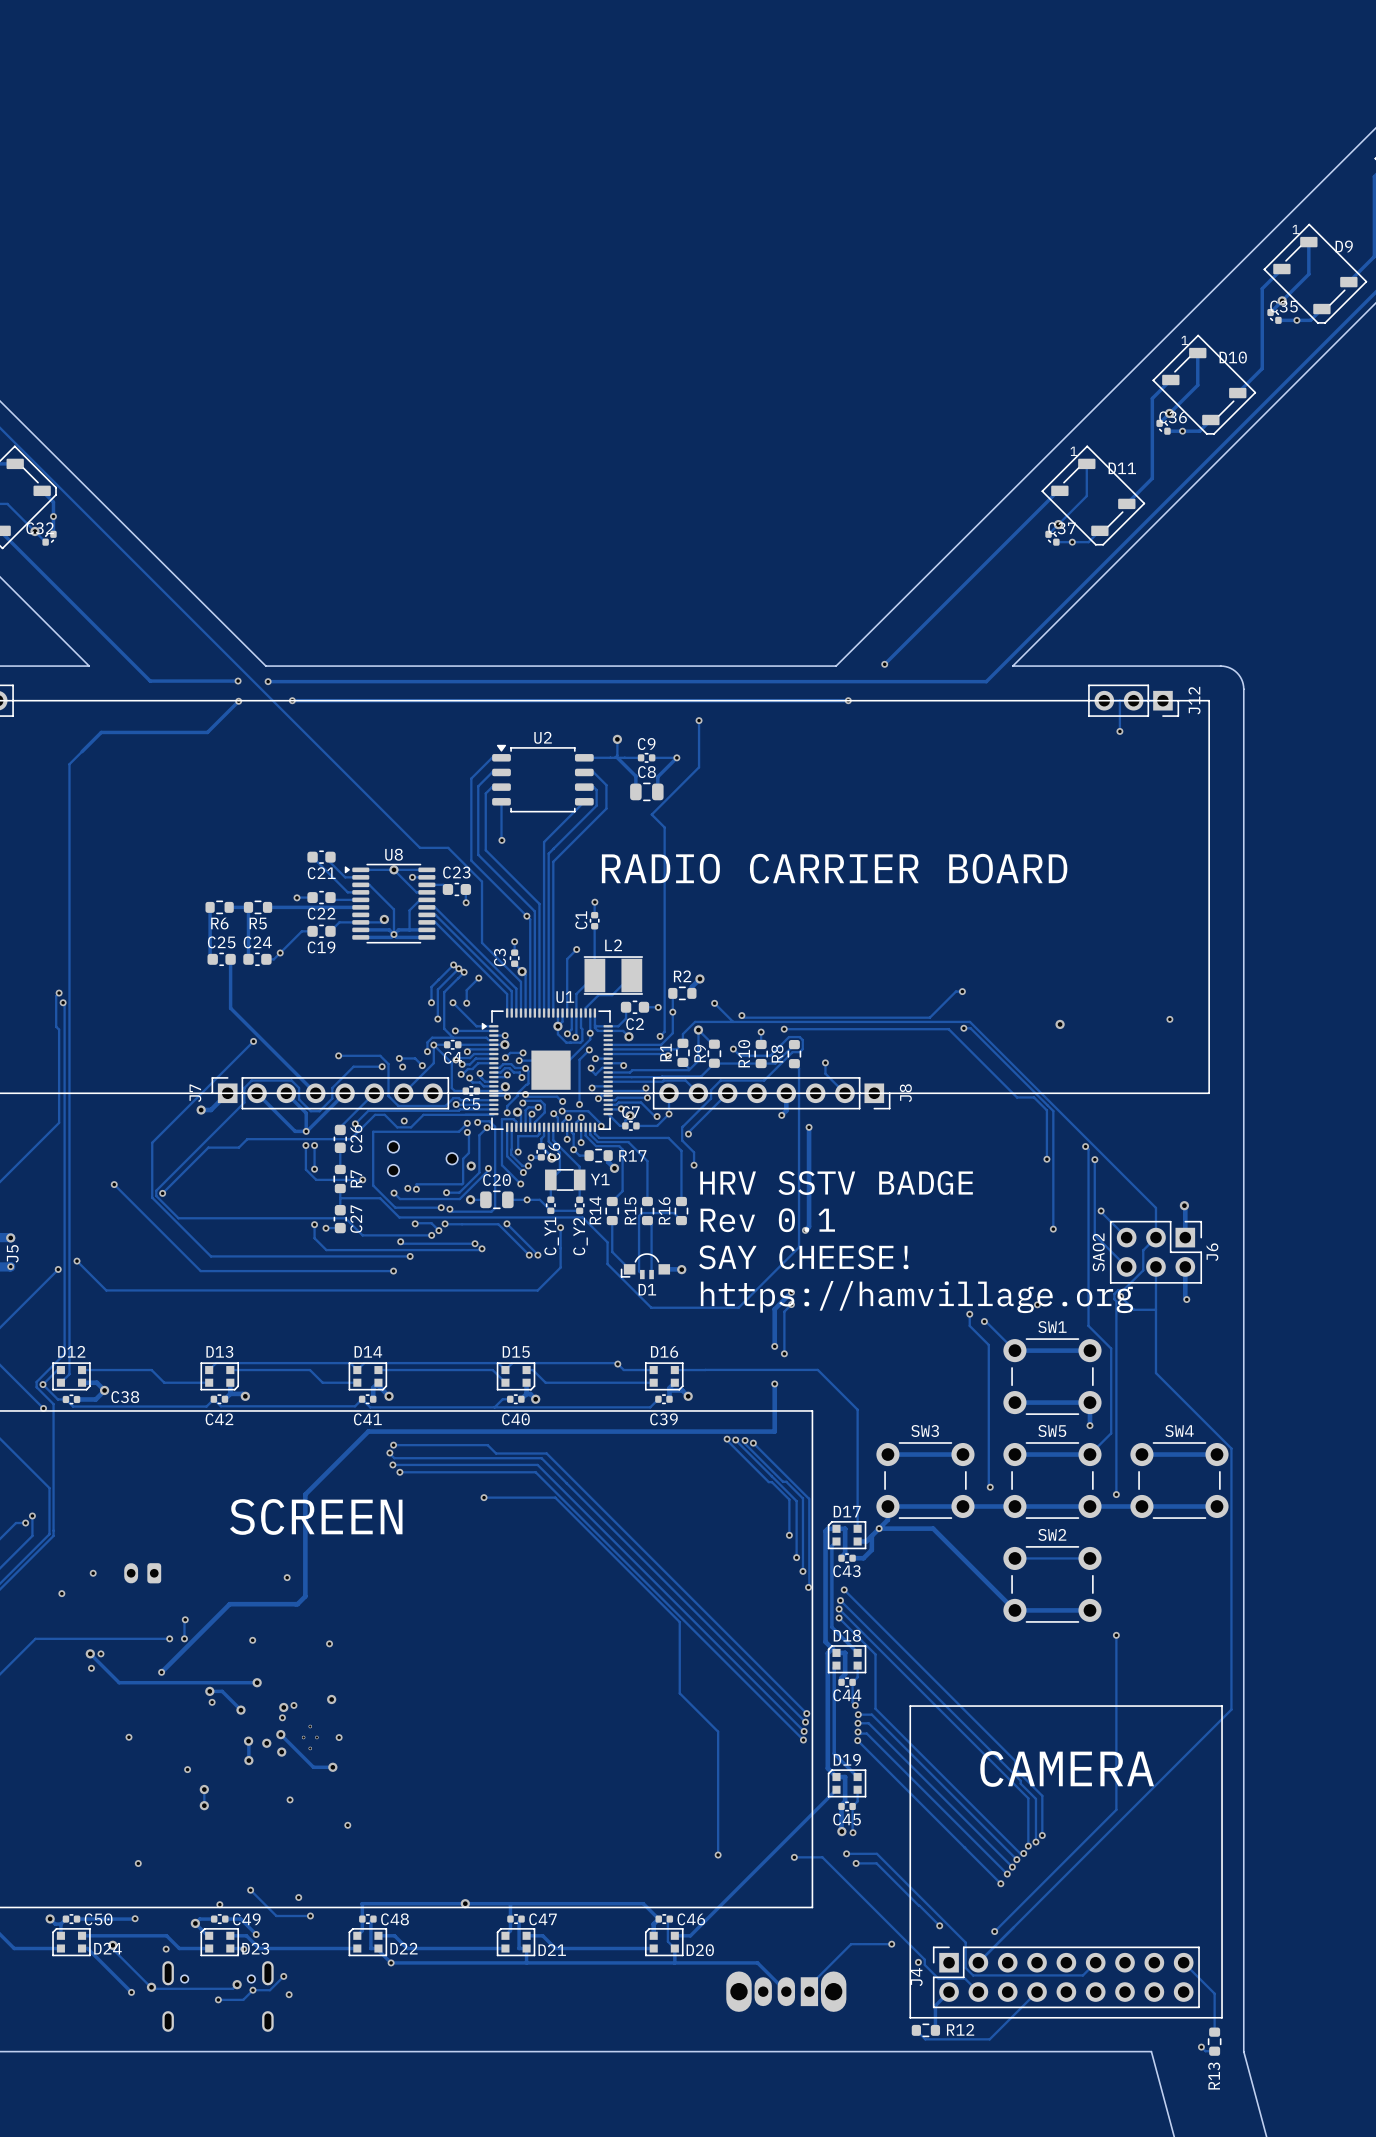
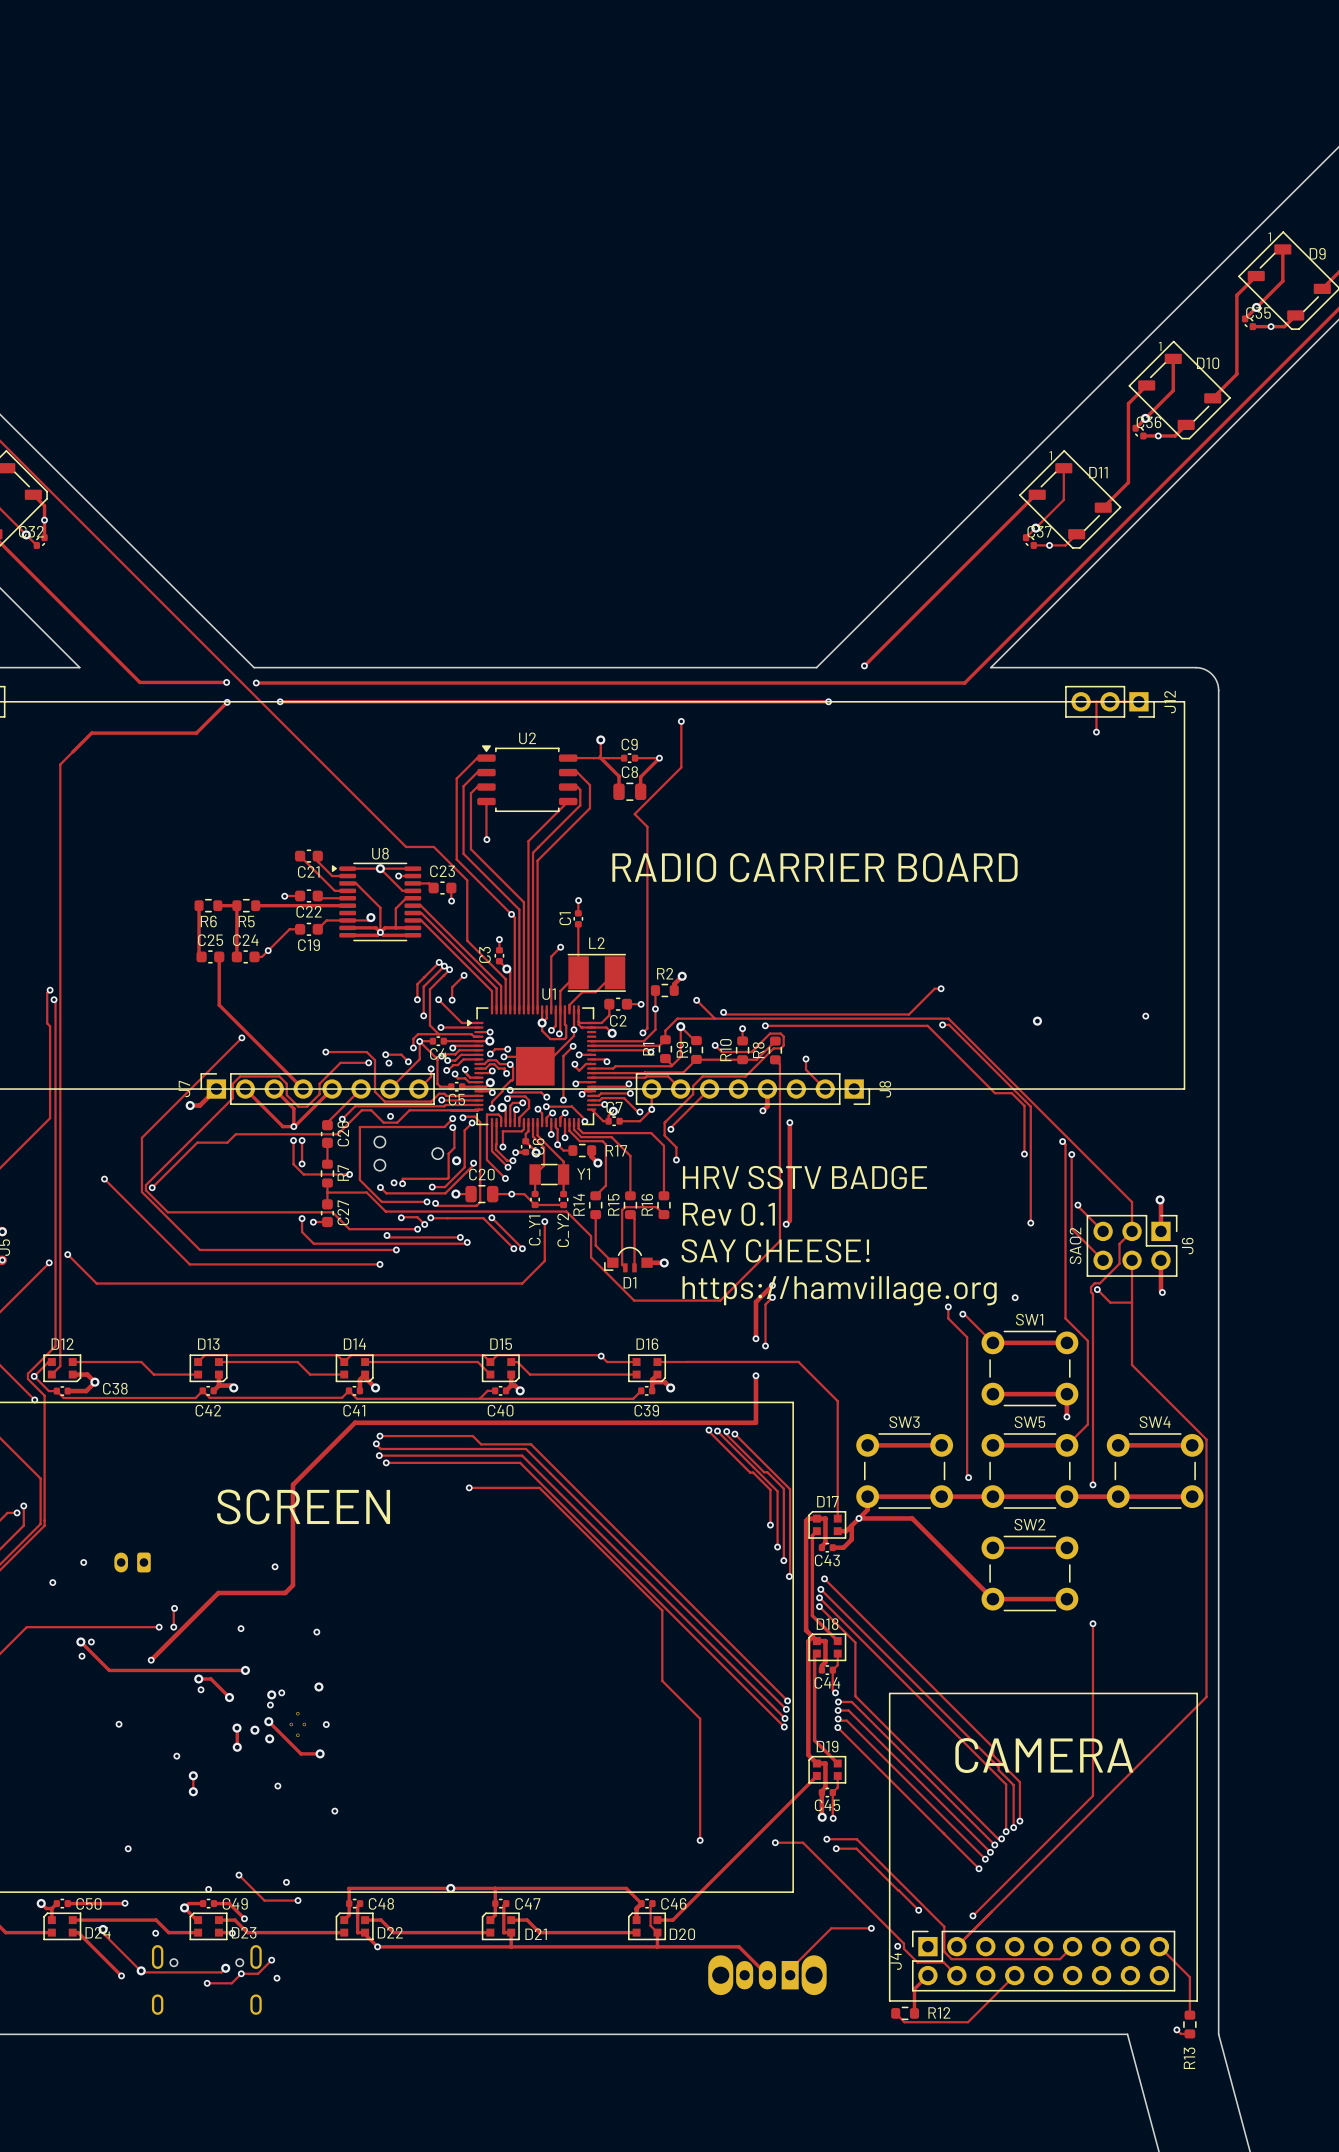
track: none -> (431, 1068) (431, 1076) (418, 1089)
via: none -> (431, 1068)

